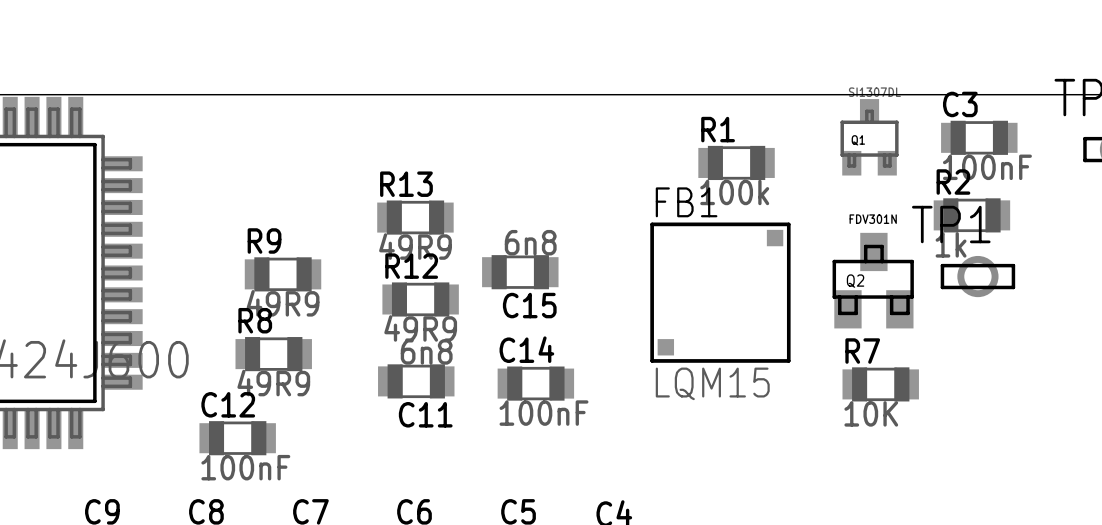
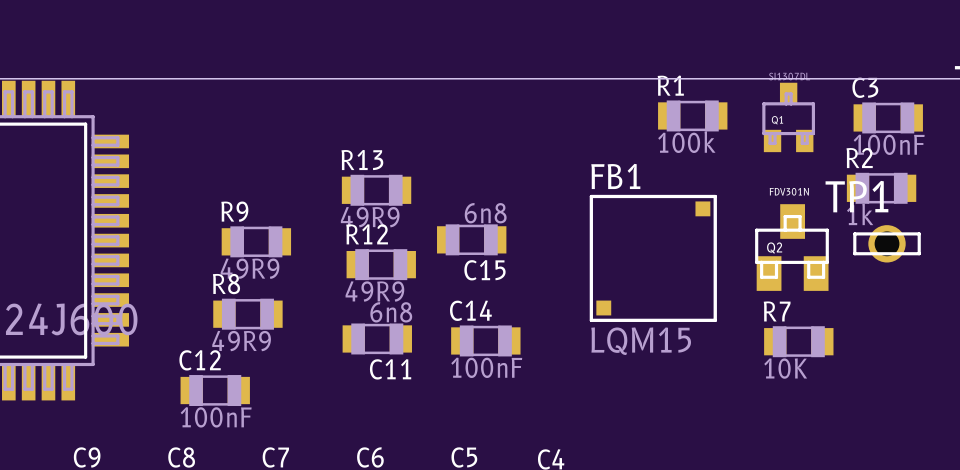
R1 position: (736, 162) -> (692, 115)

